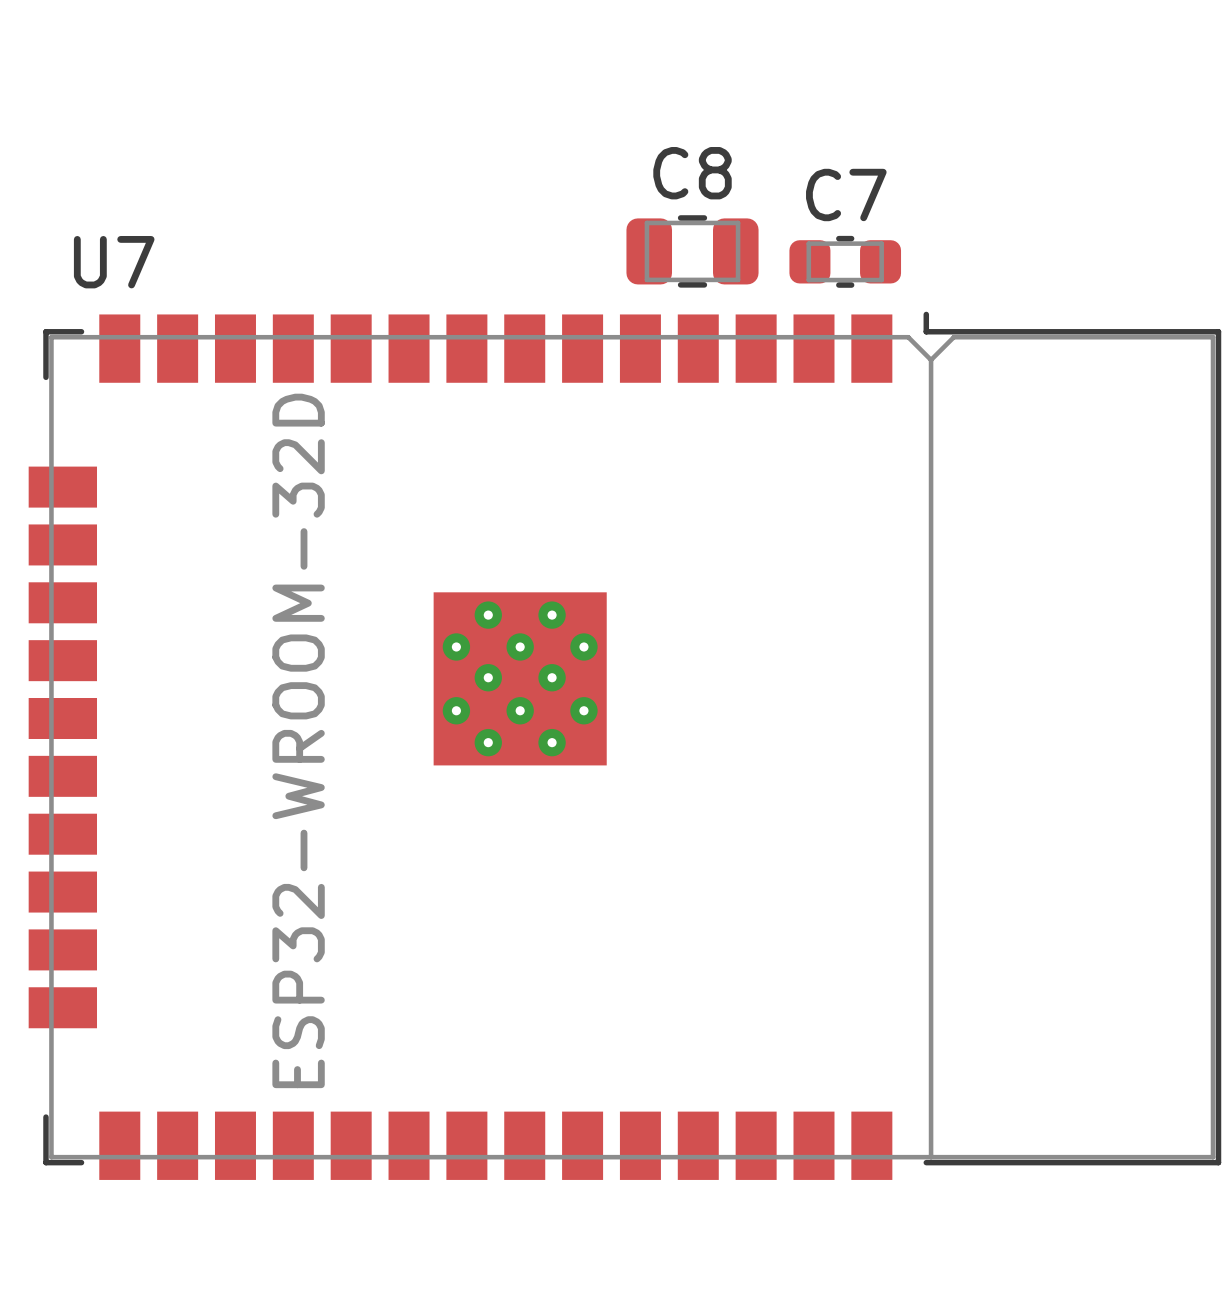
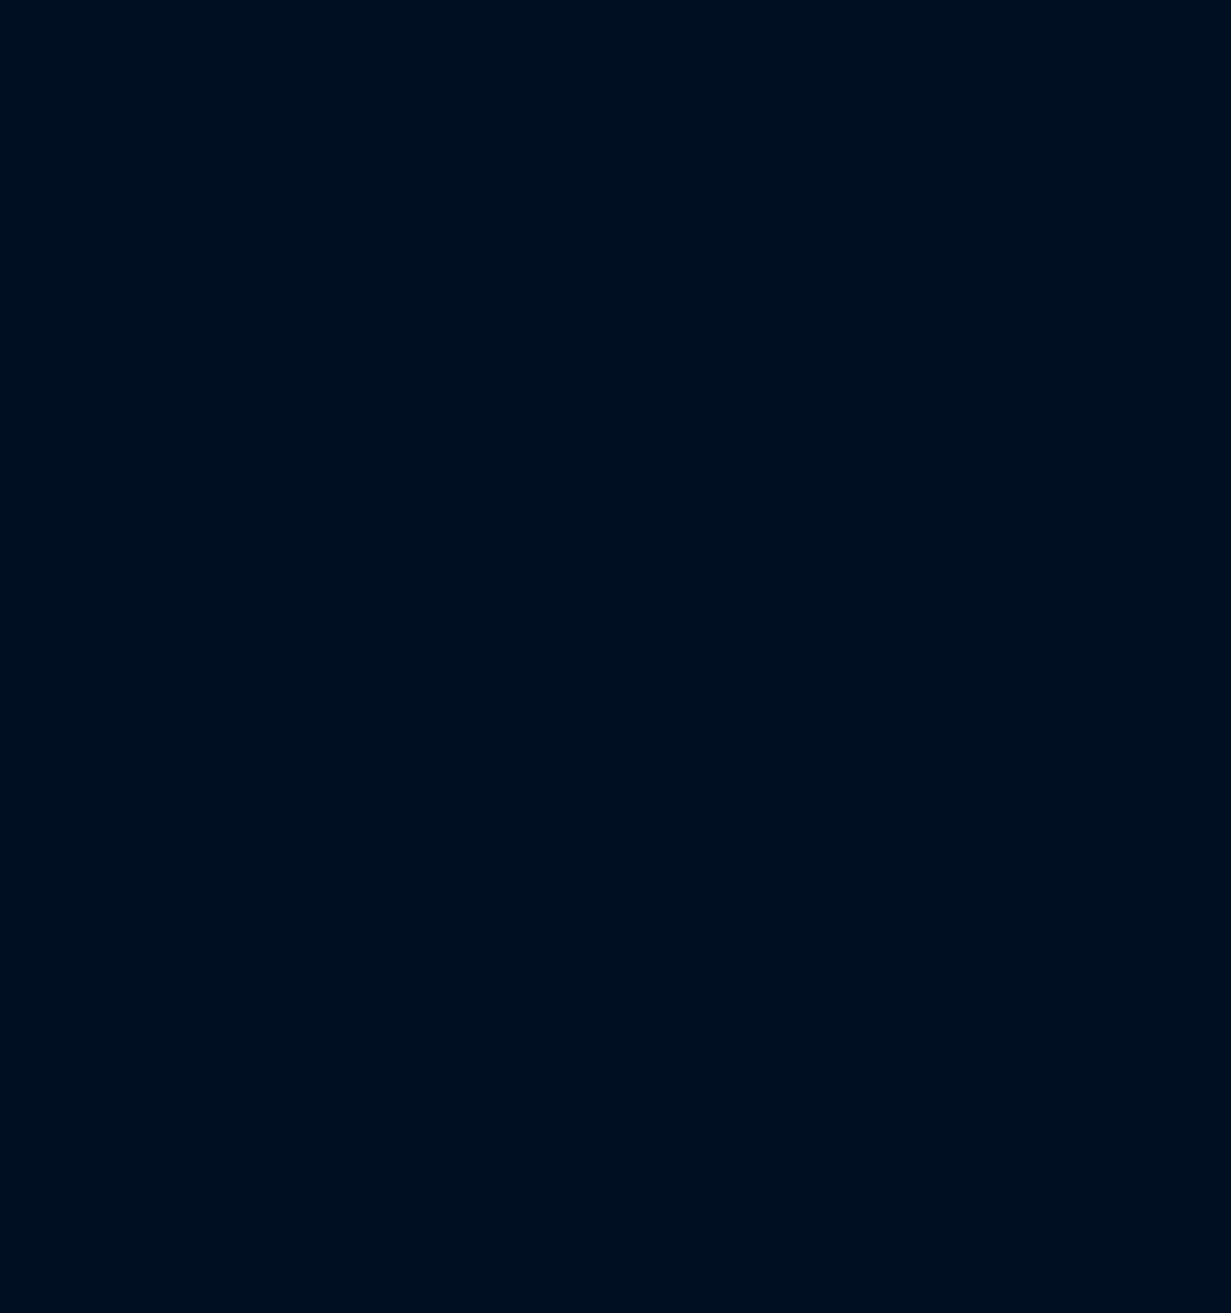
C8: (692, 251) -> none
C7: (845, 261) -> none
U7: ESP32-WROOM-32D (624, 745) -> none

